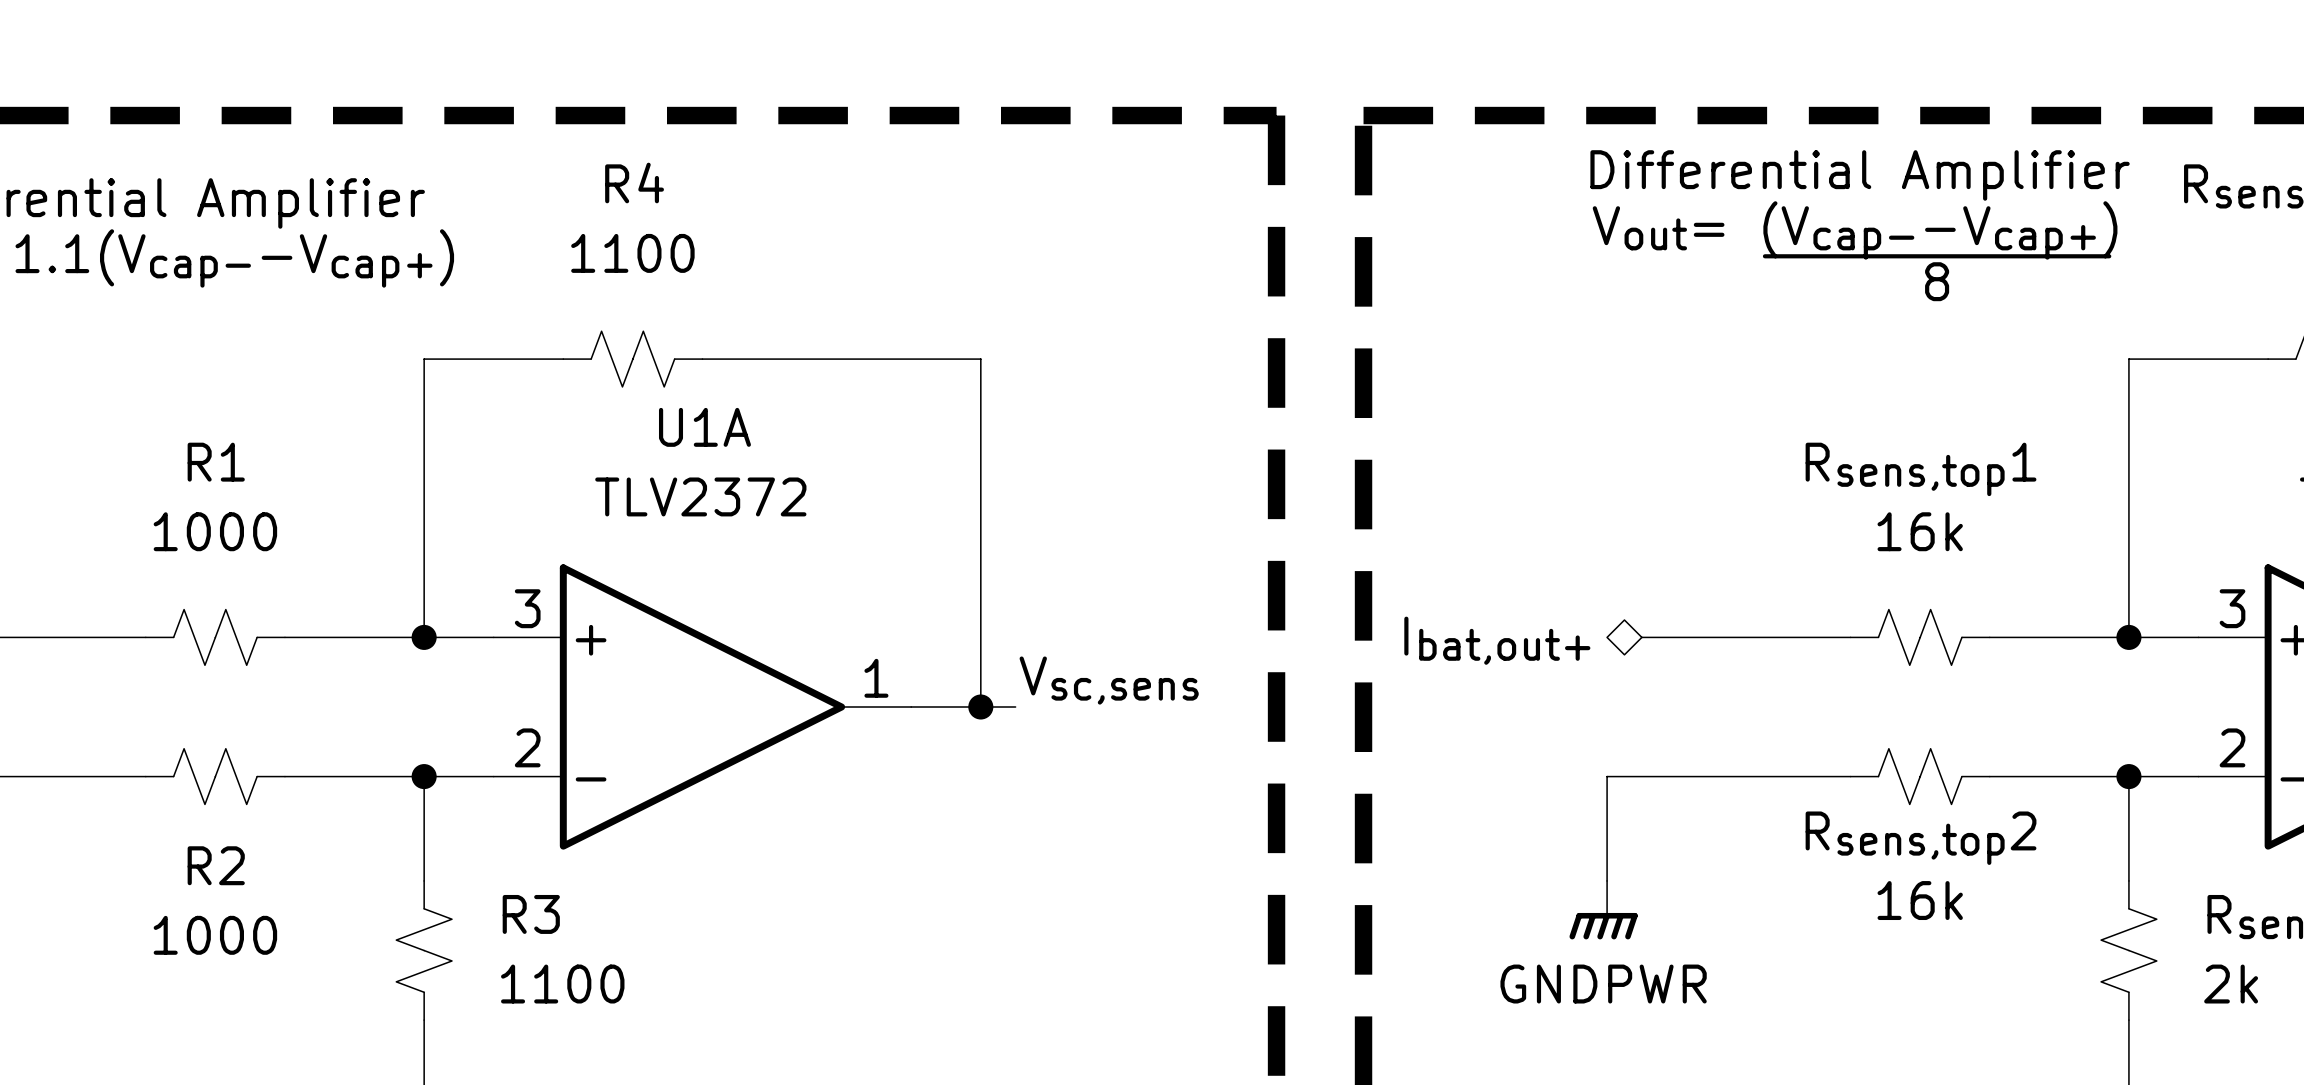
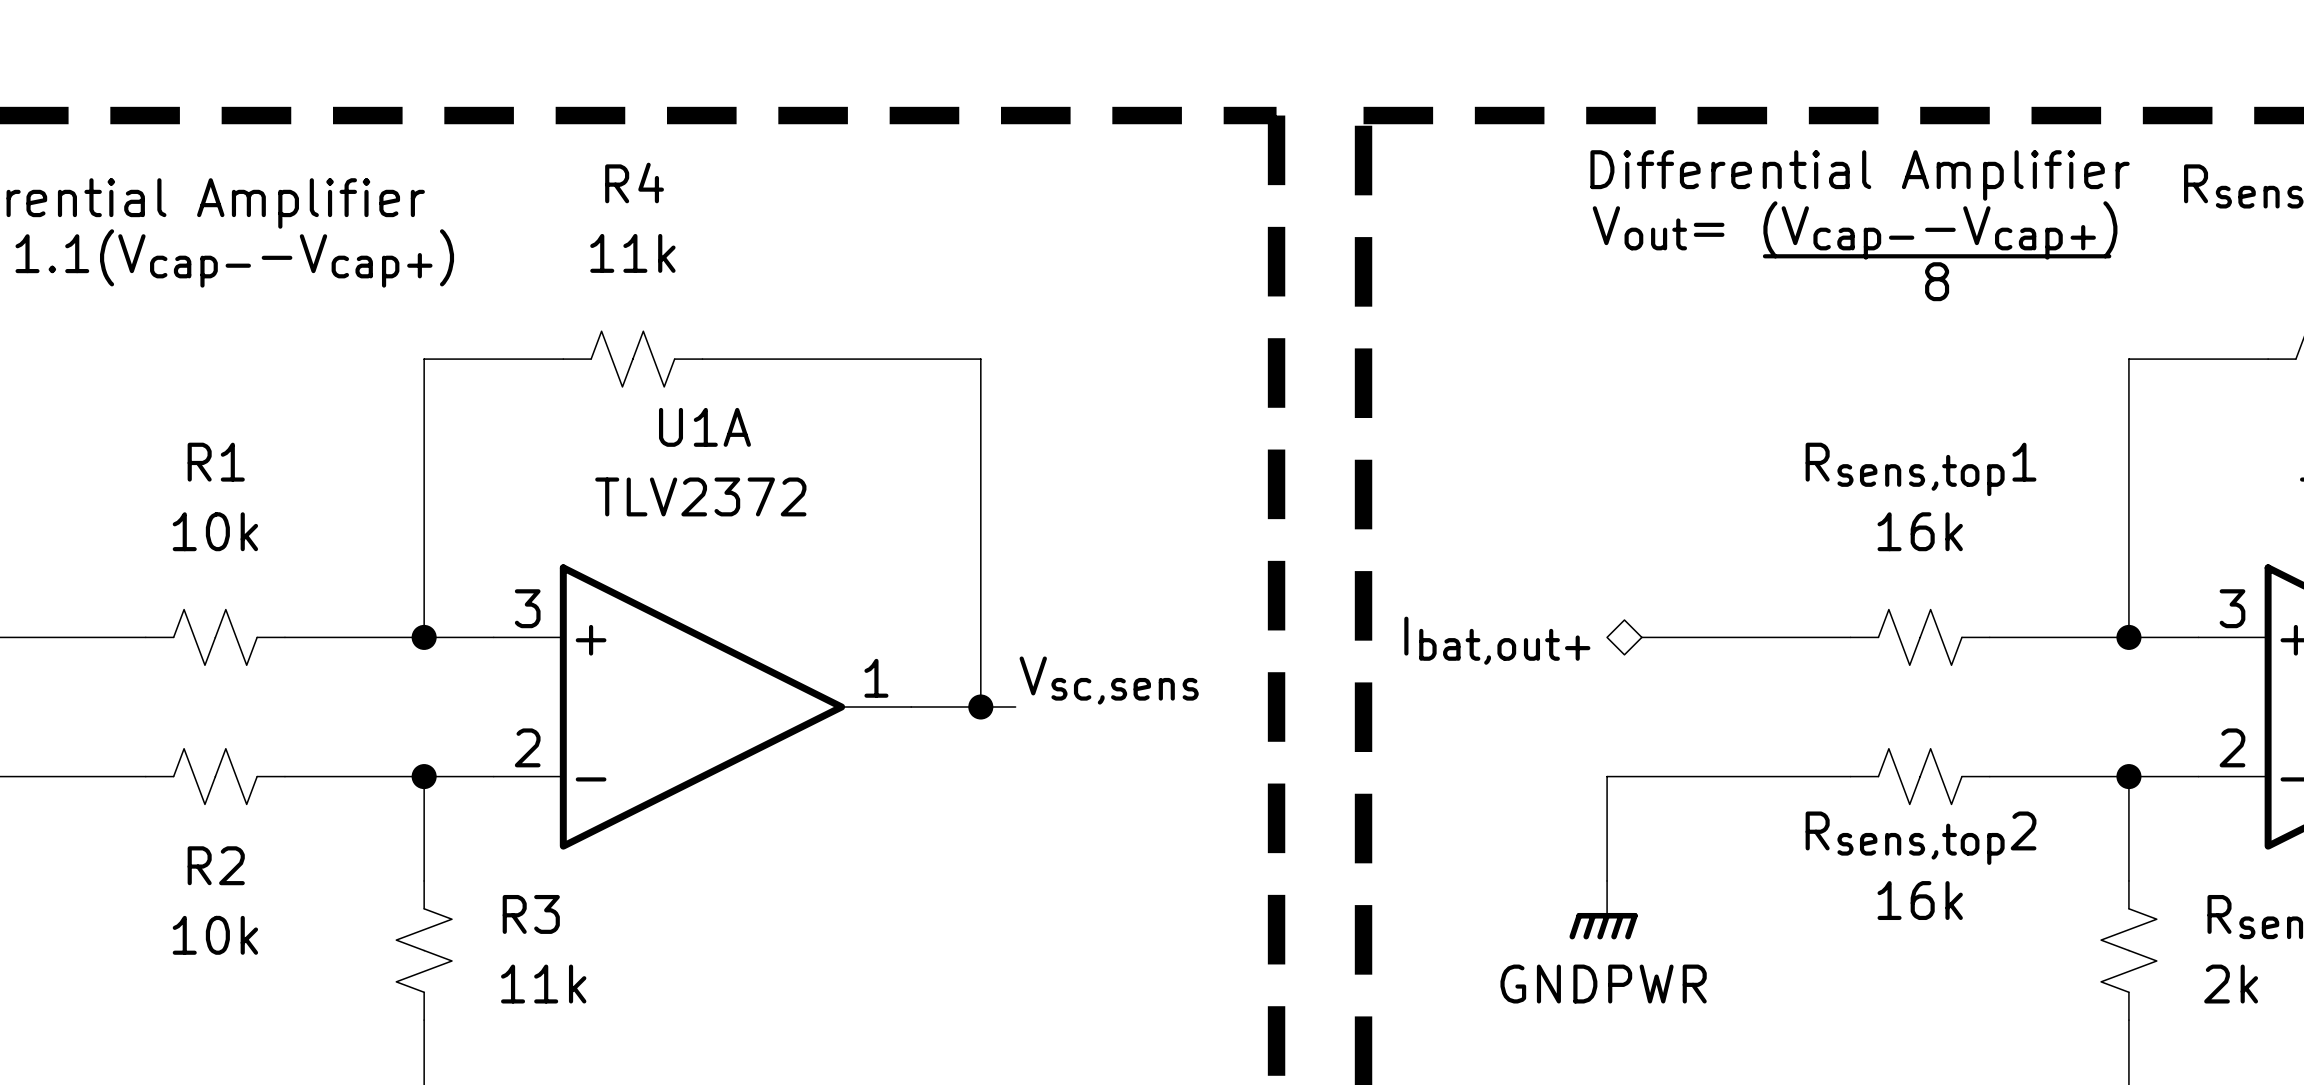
R4 value: 1100 (632, 253) -> 11k (632, 253)
R1 value: 1000 (215, 531) -> 10k (215, 531)
R2 value: 1000 (215, 935) -> 10k (215, 935)
R3 value: 1100 (562, 984) -> 11k (543, 984)

